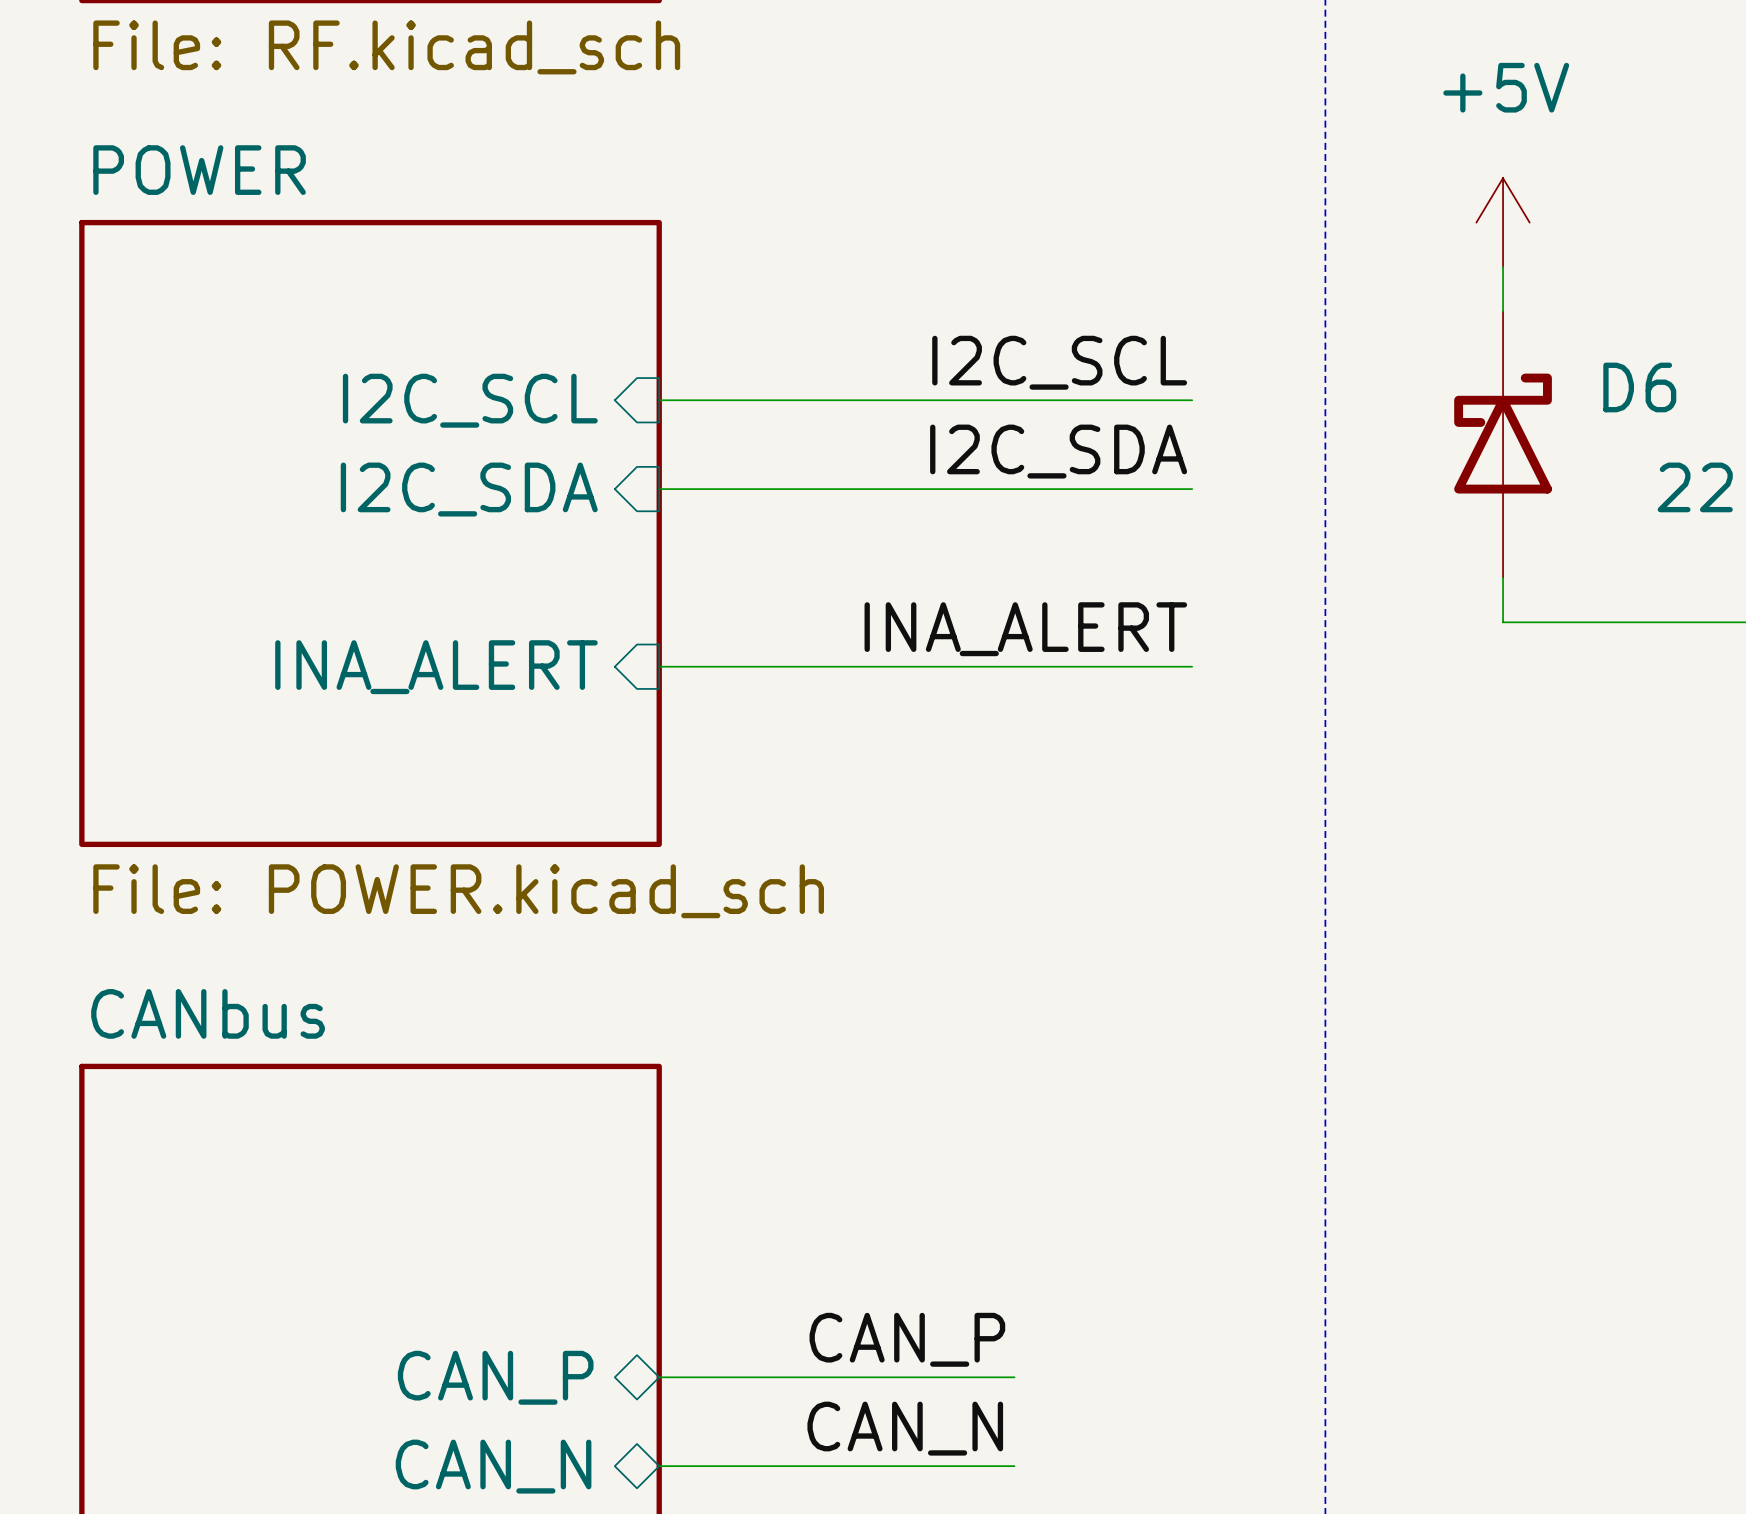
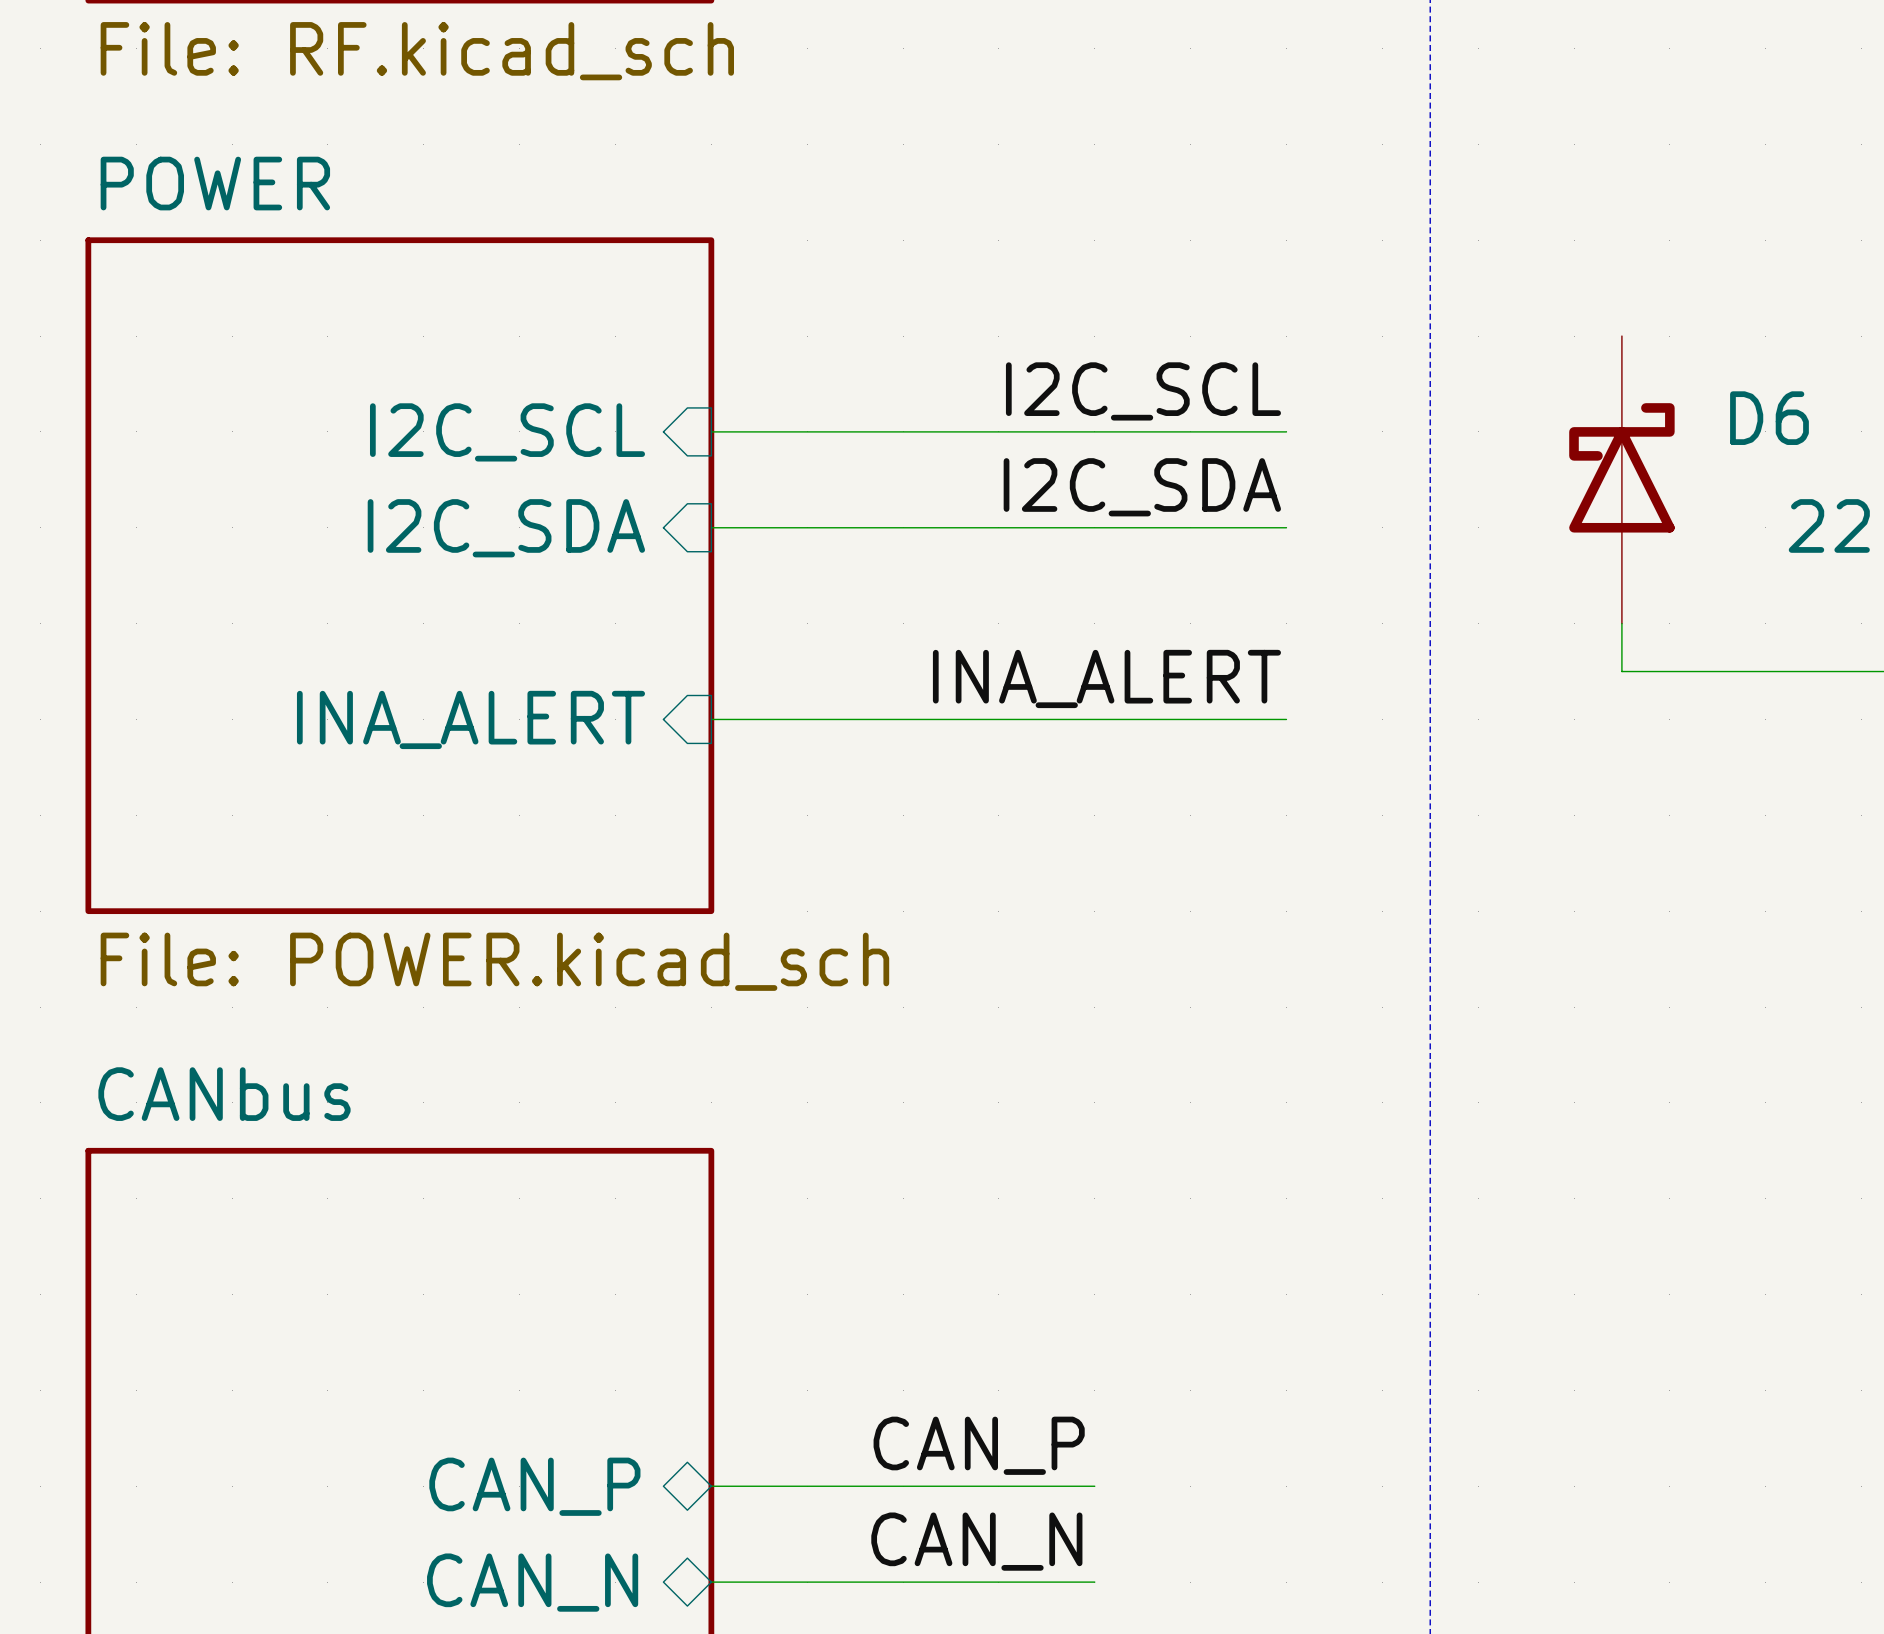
power symbol: +5V (1503, 222) -> none
wire: (1503, 267) (1503, 311) -> none

